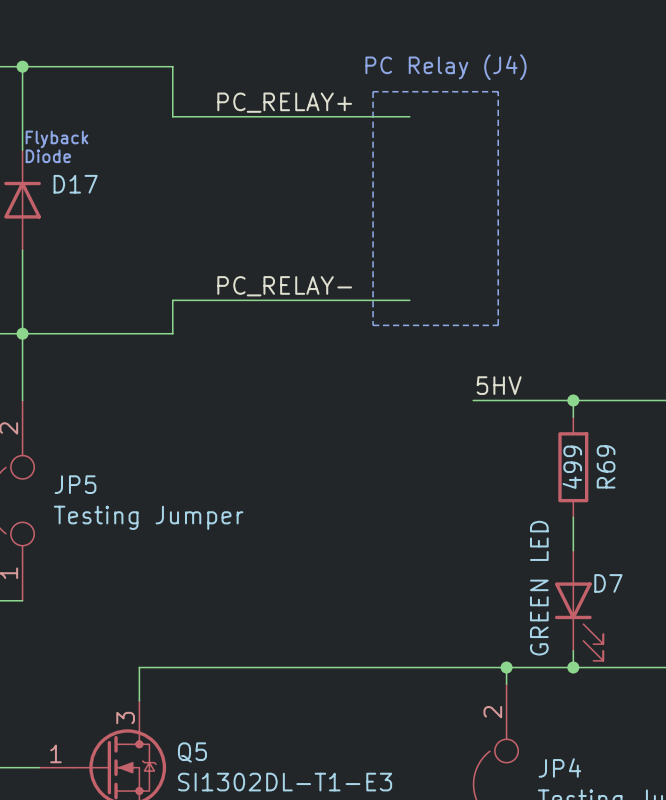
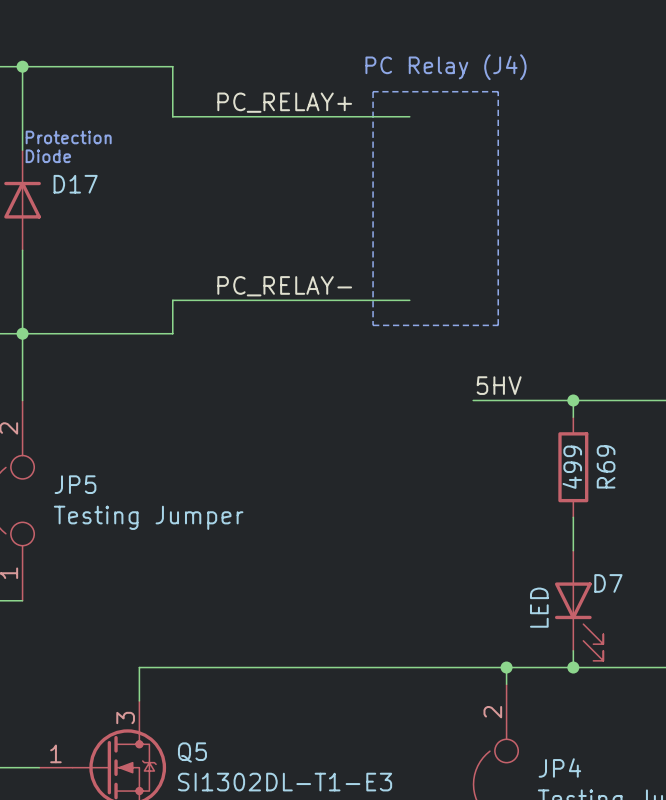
text: Flyback (56, 139) -> Protection (68, 137)
D7 value: GREEN LED (539, 588) -> LED (539, 607)

